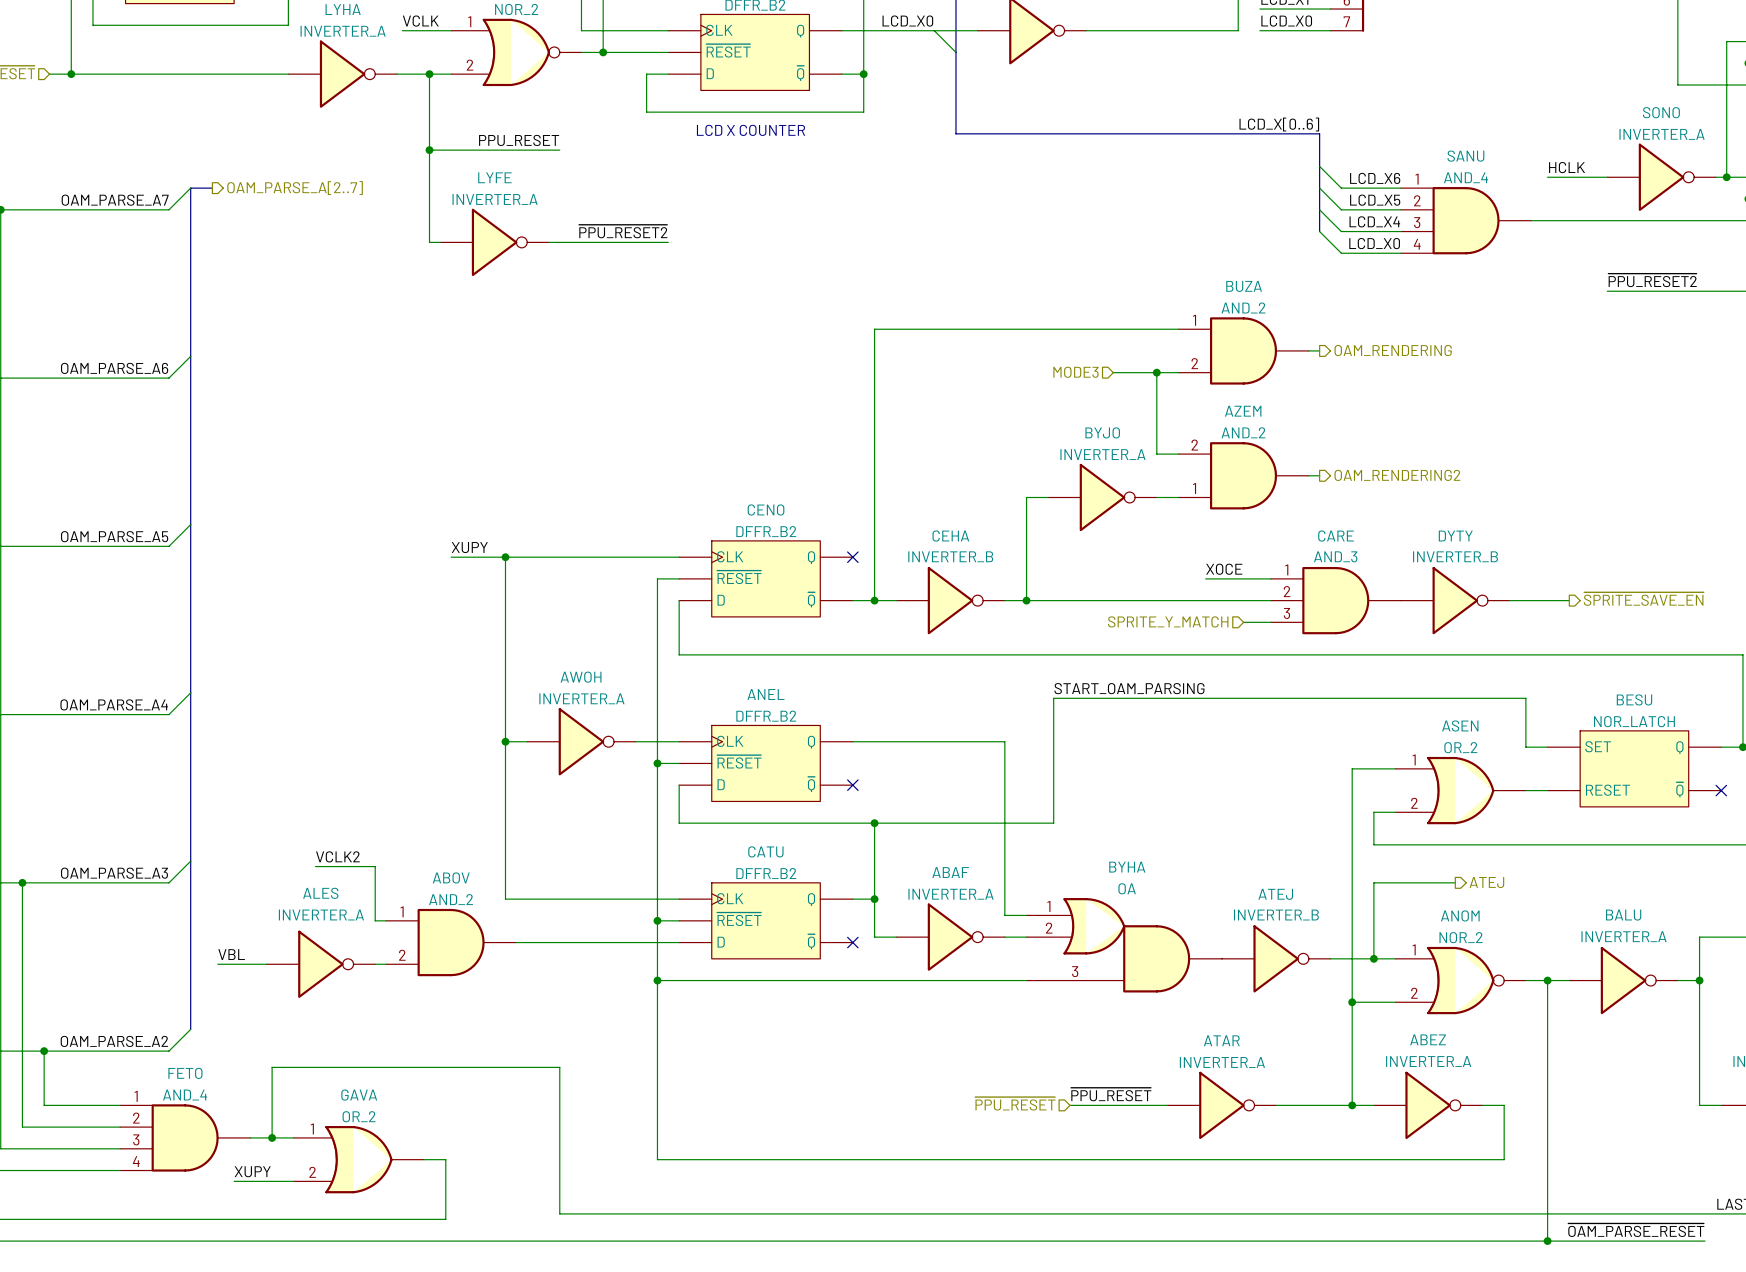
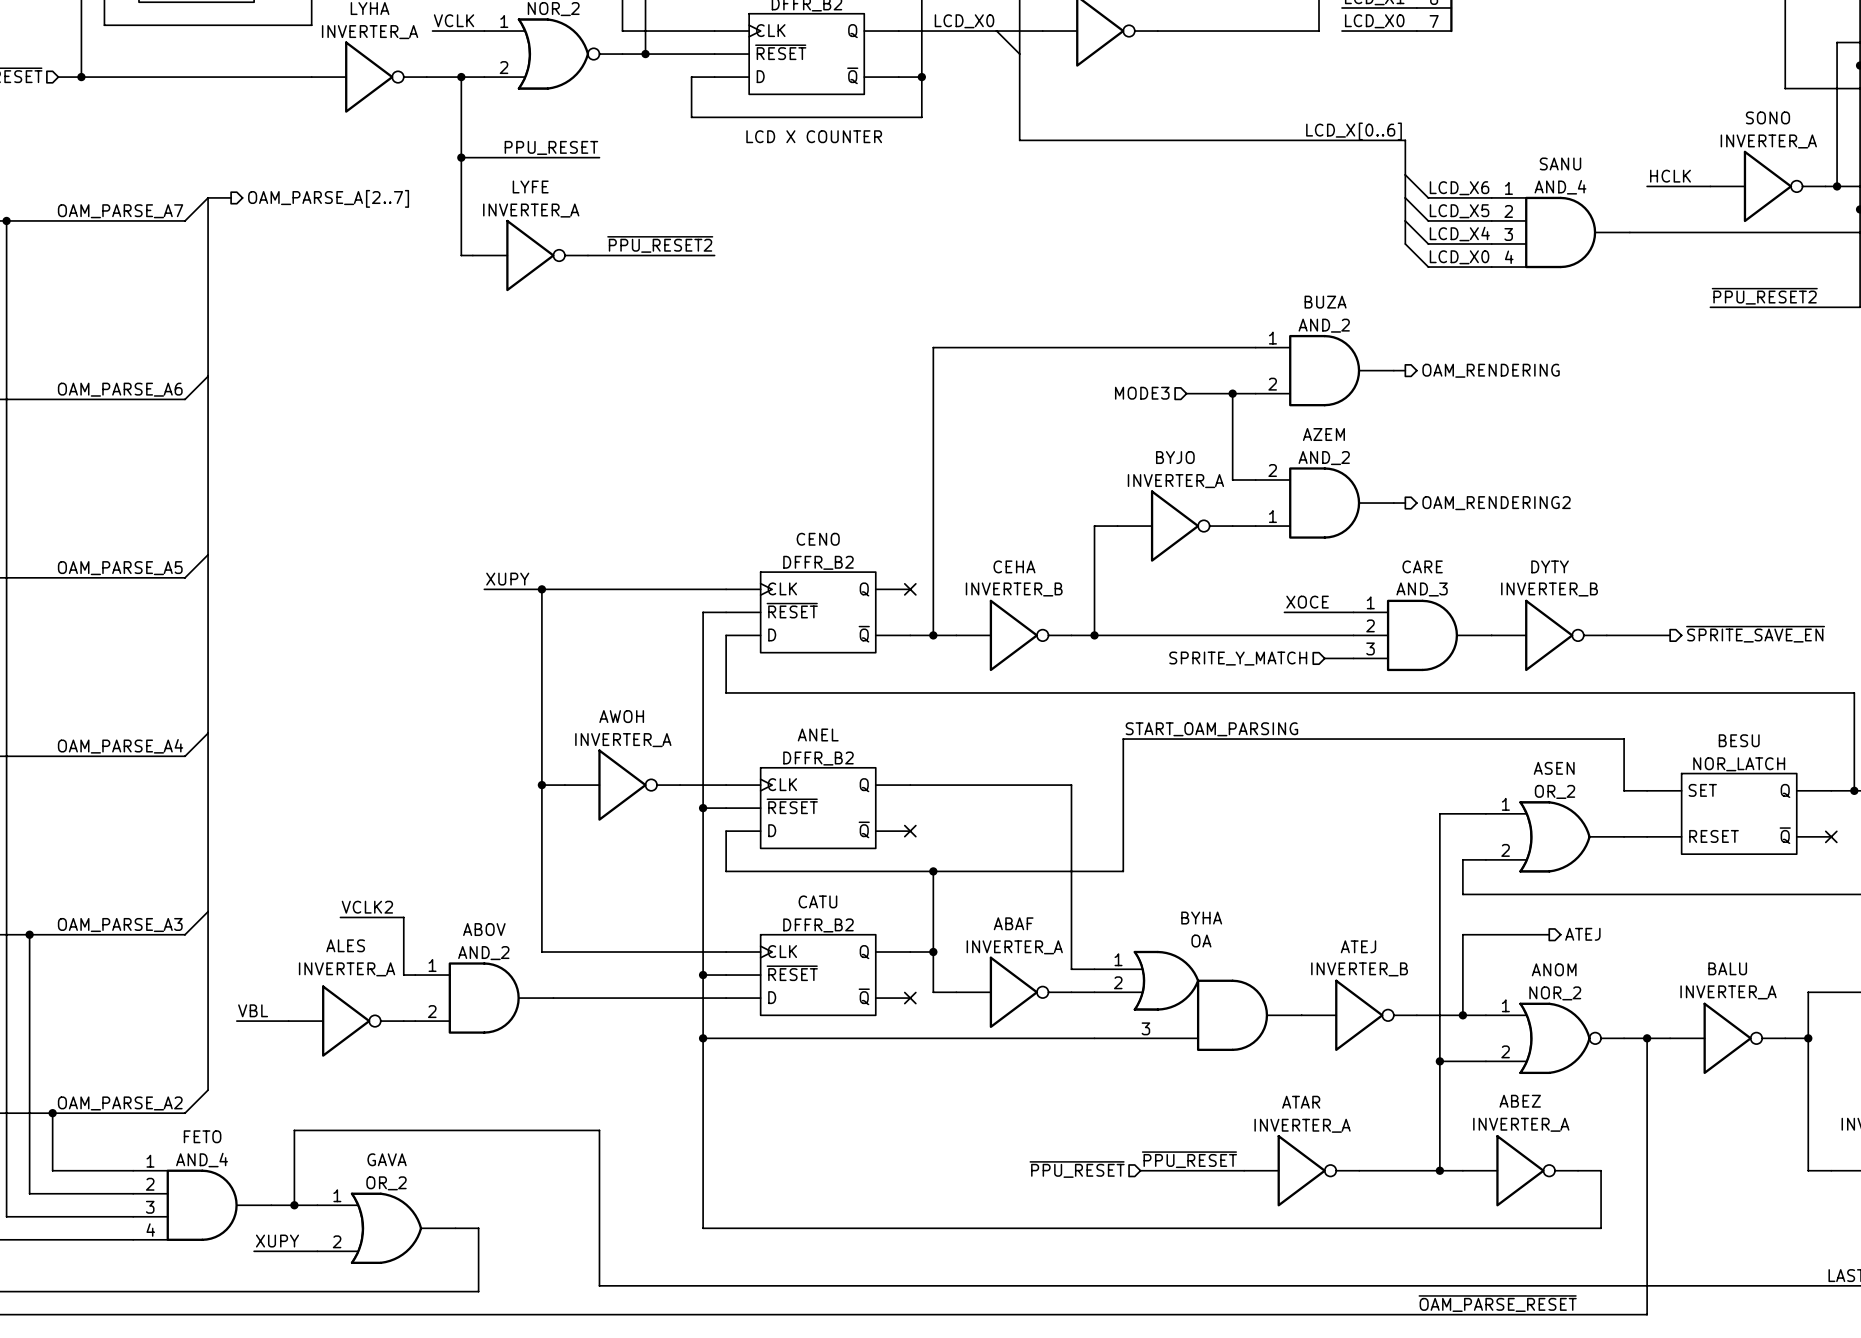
label: none -> ~{OAM_PARSE_RESET} (1497, 1303)
label: ~{OAM_PARSE_RESET} (1636, 1230) -> none
wire: (1547, 1241) (1704, 1241) -> none
junction: (1547, 1241) -> none

